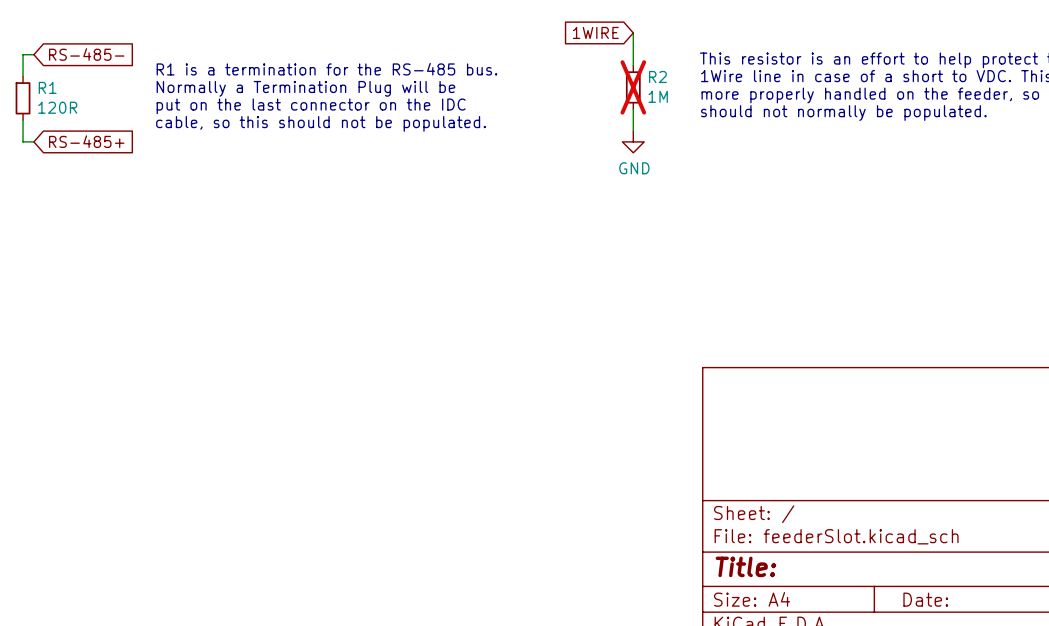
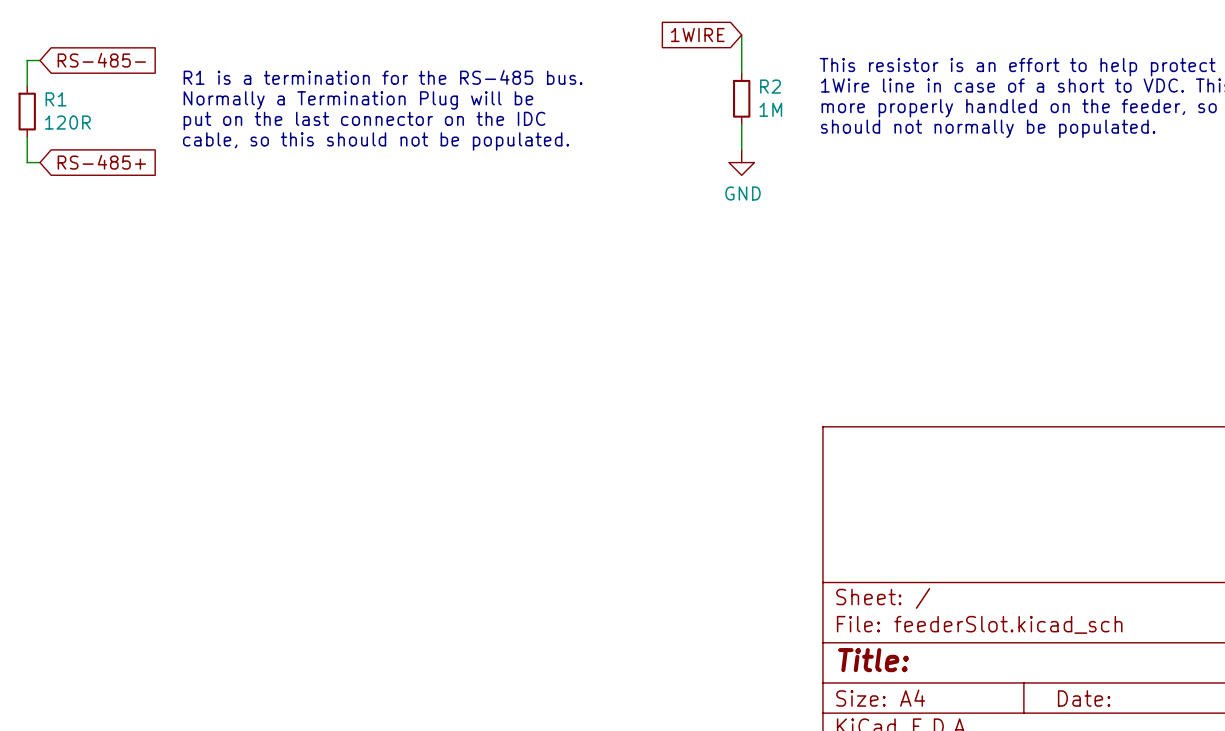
R2 do-not-place cross: (633, 87) -> none

